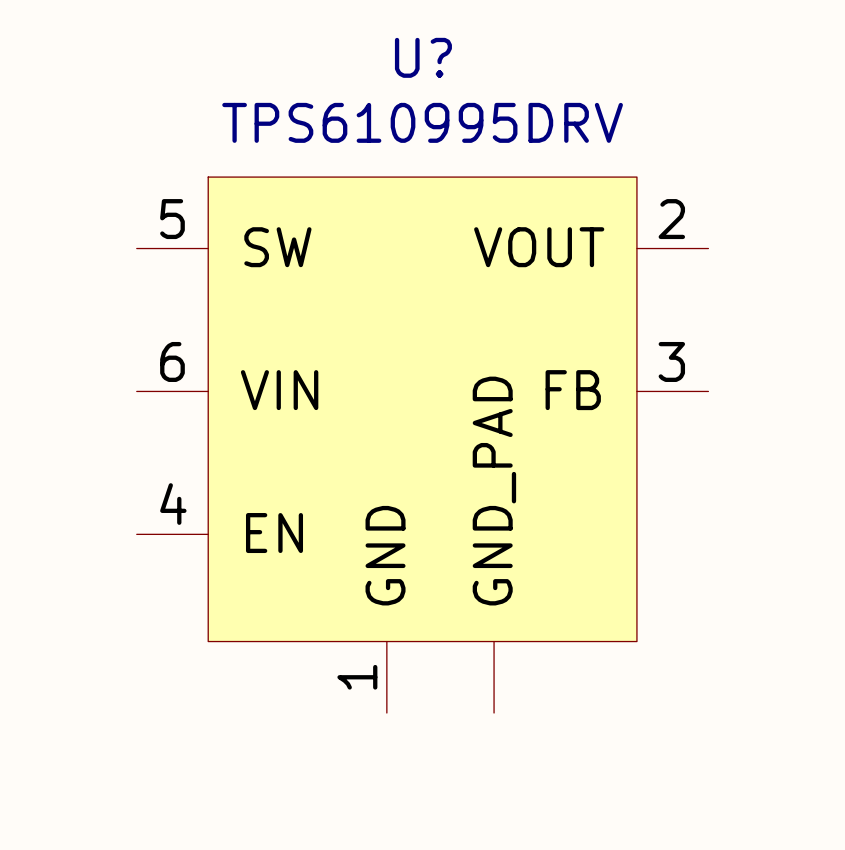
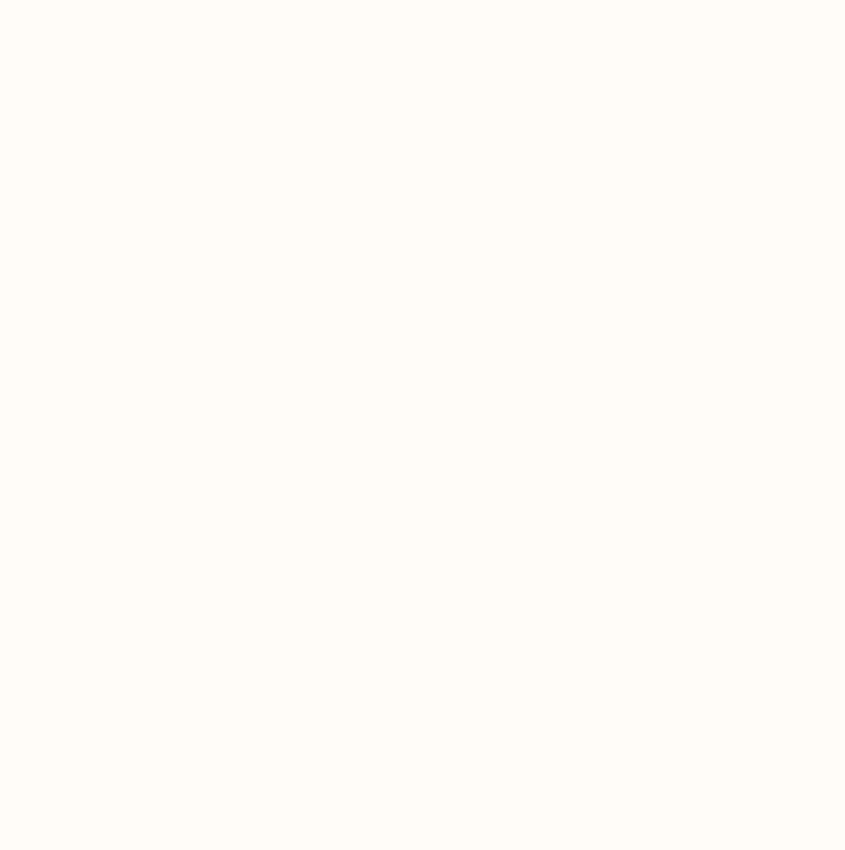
U?: TPS610995DRV (422, 445) -> none

